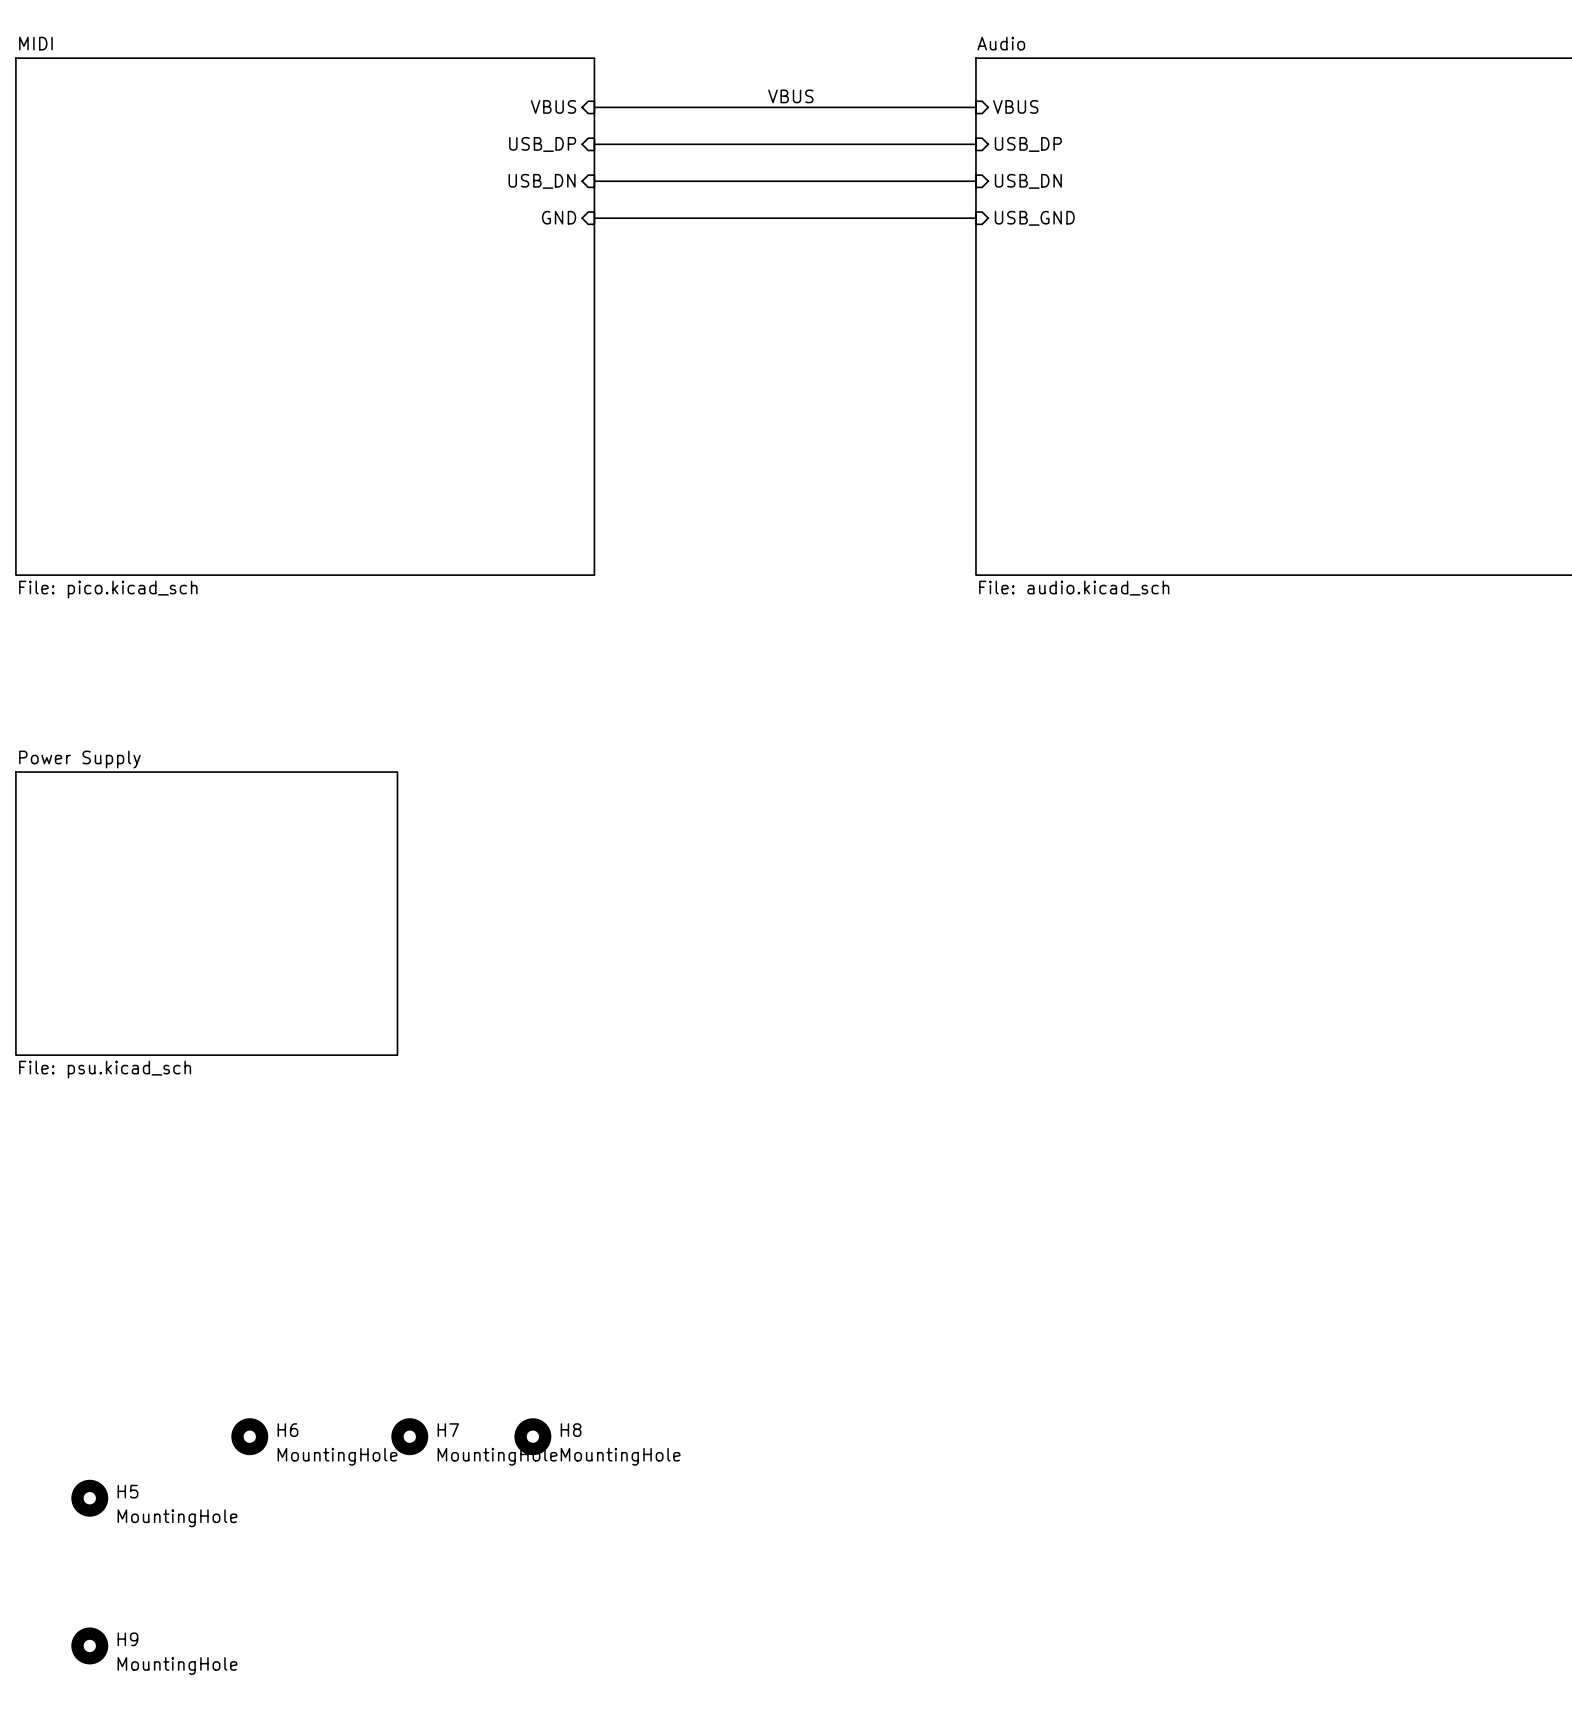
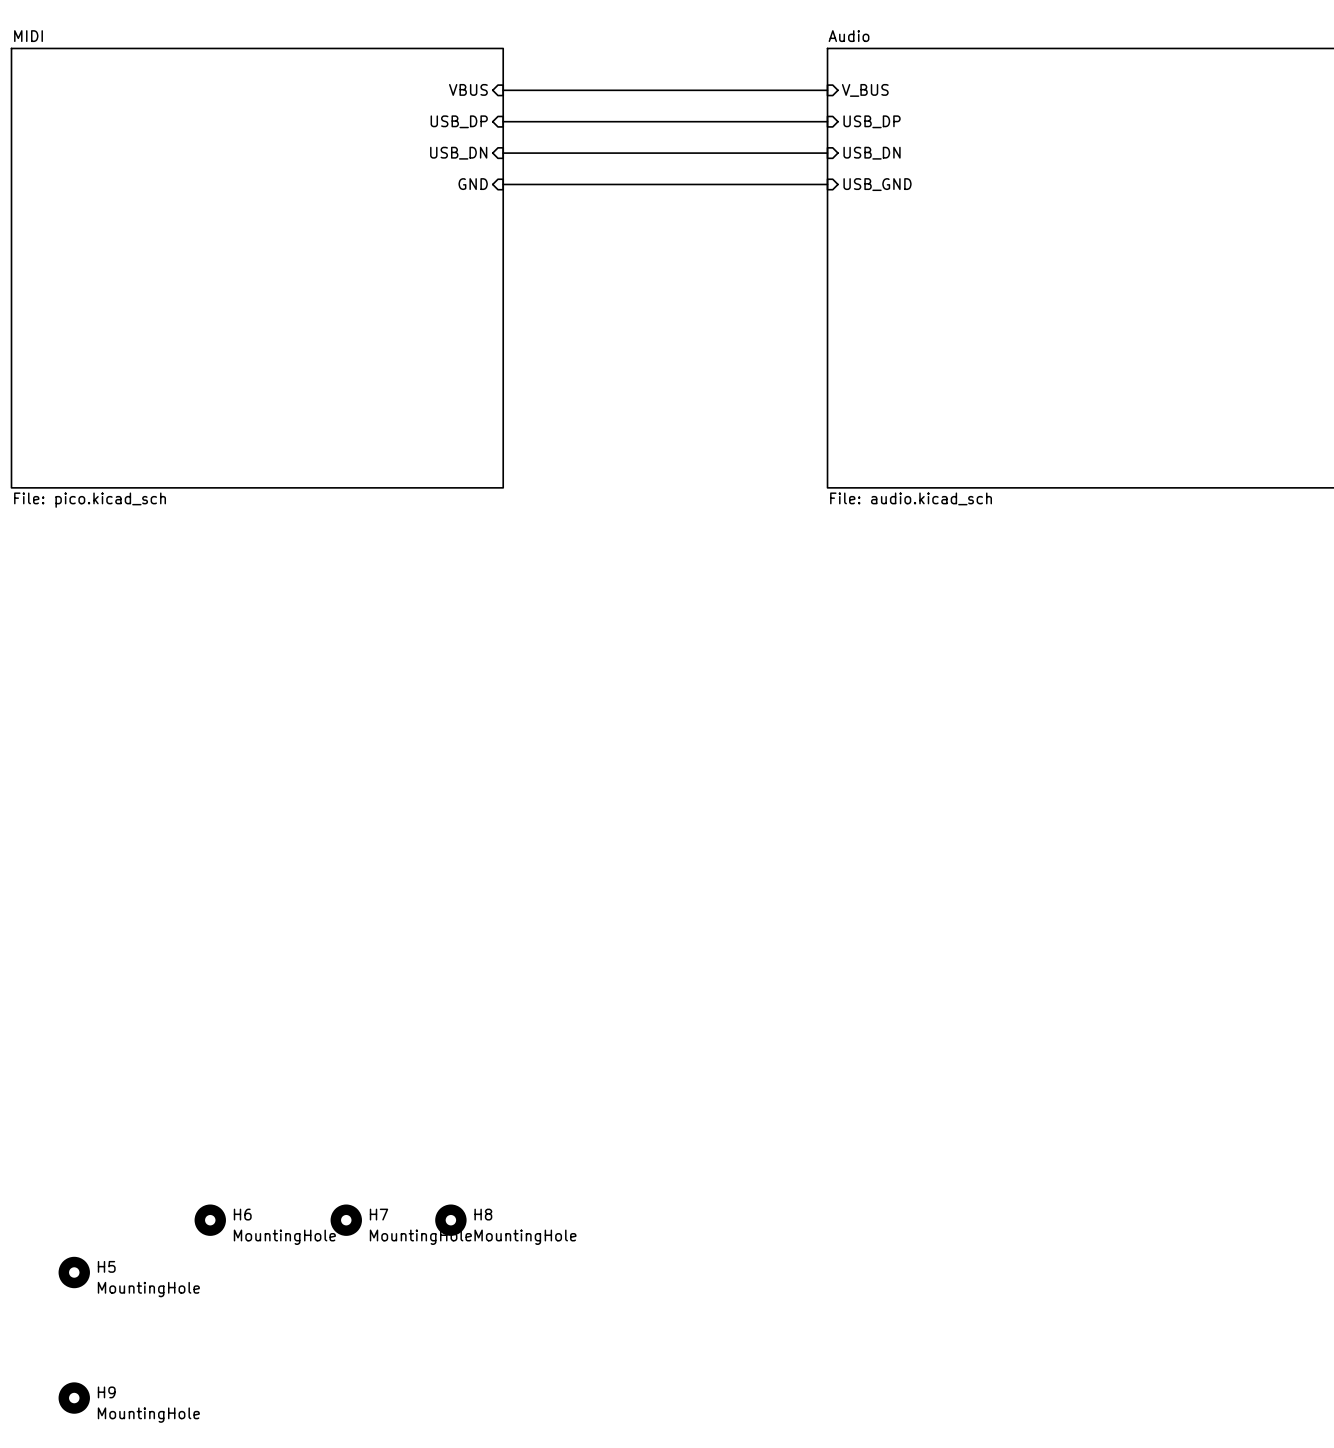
label: VBUS (790, 96) -> none
sheet pin: VBUS (1015, 106) -> V_BUS (865, 90)
sheet Power Supply: File: psu.kicad_sch (206, 913) -> none

